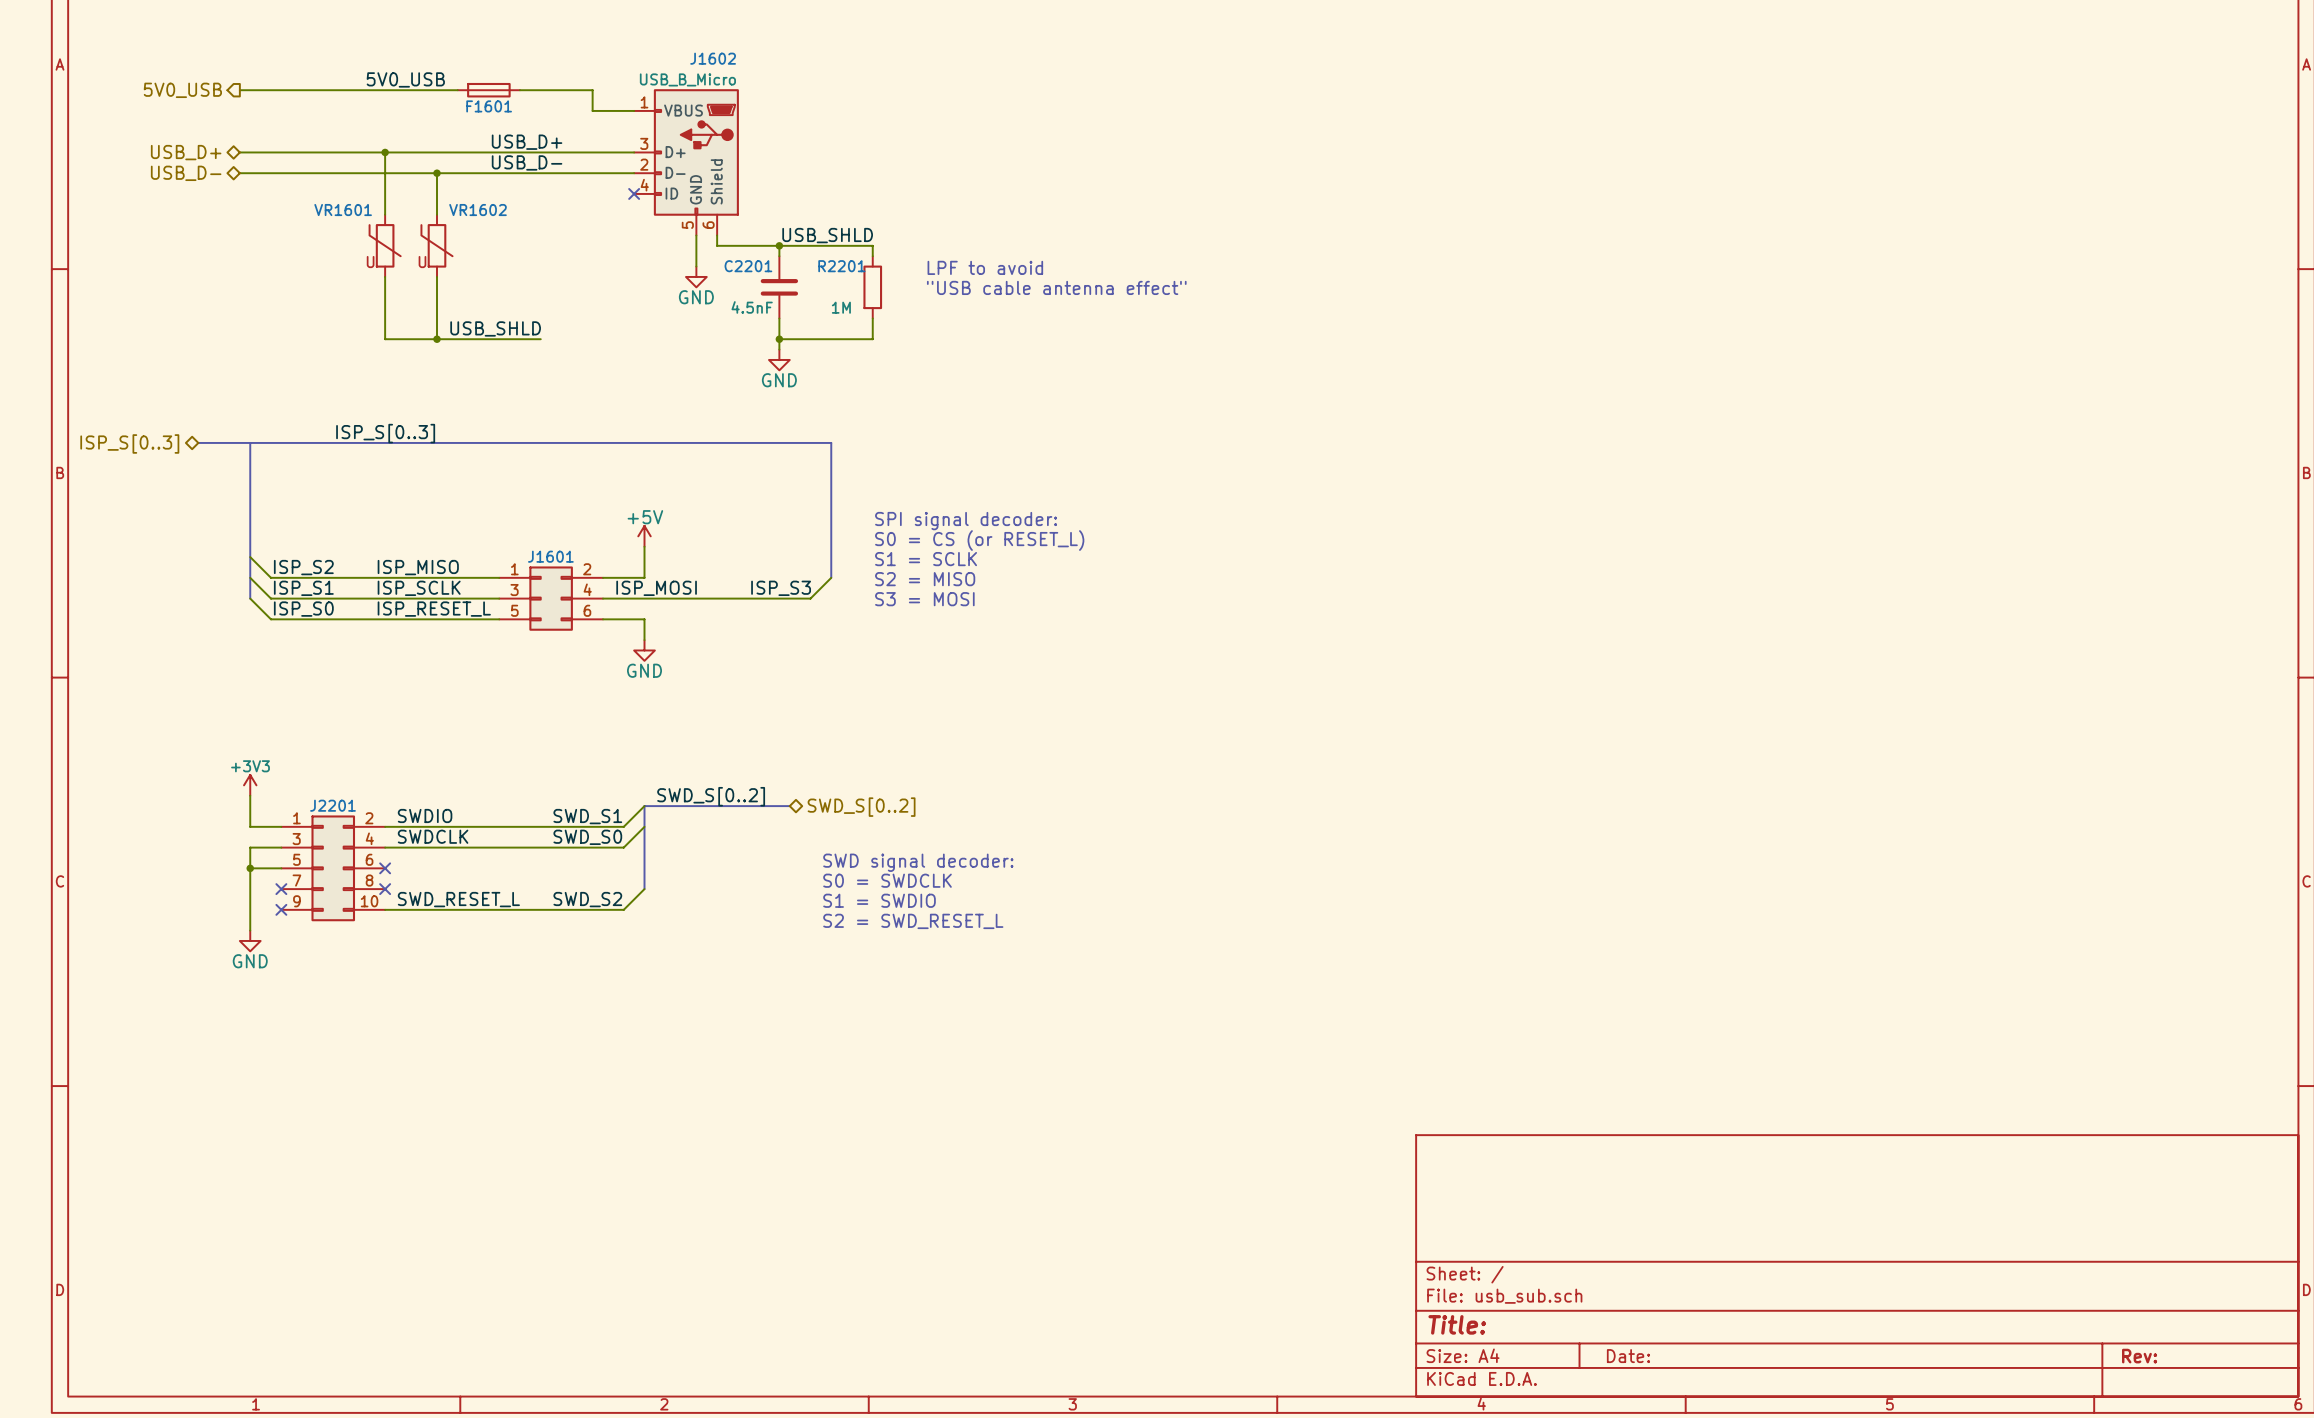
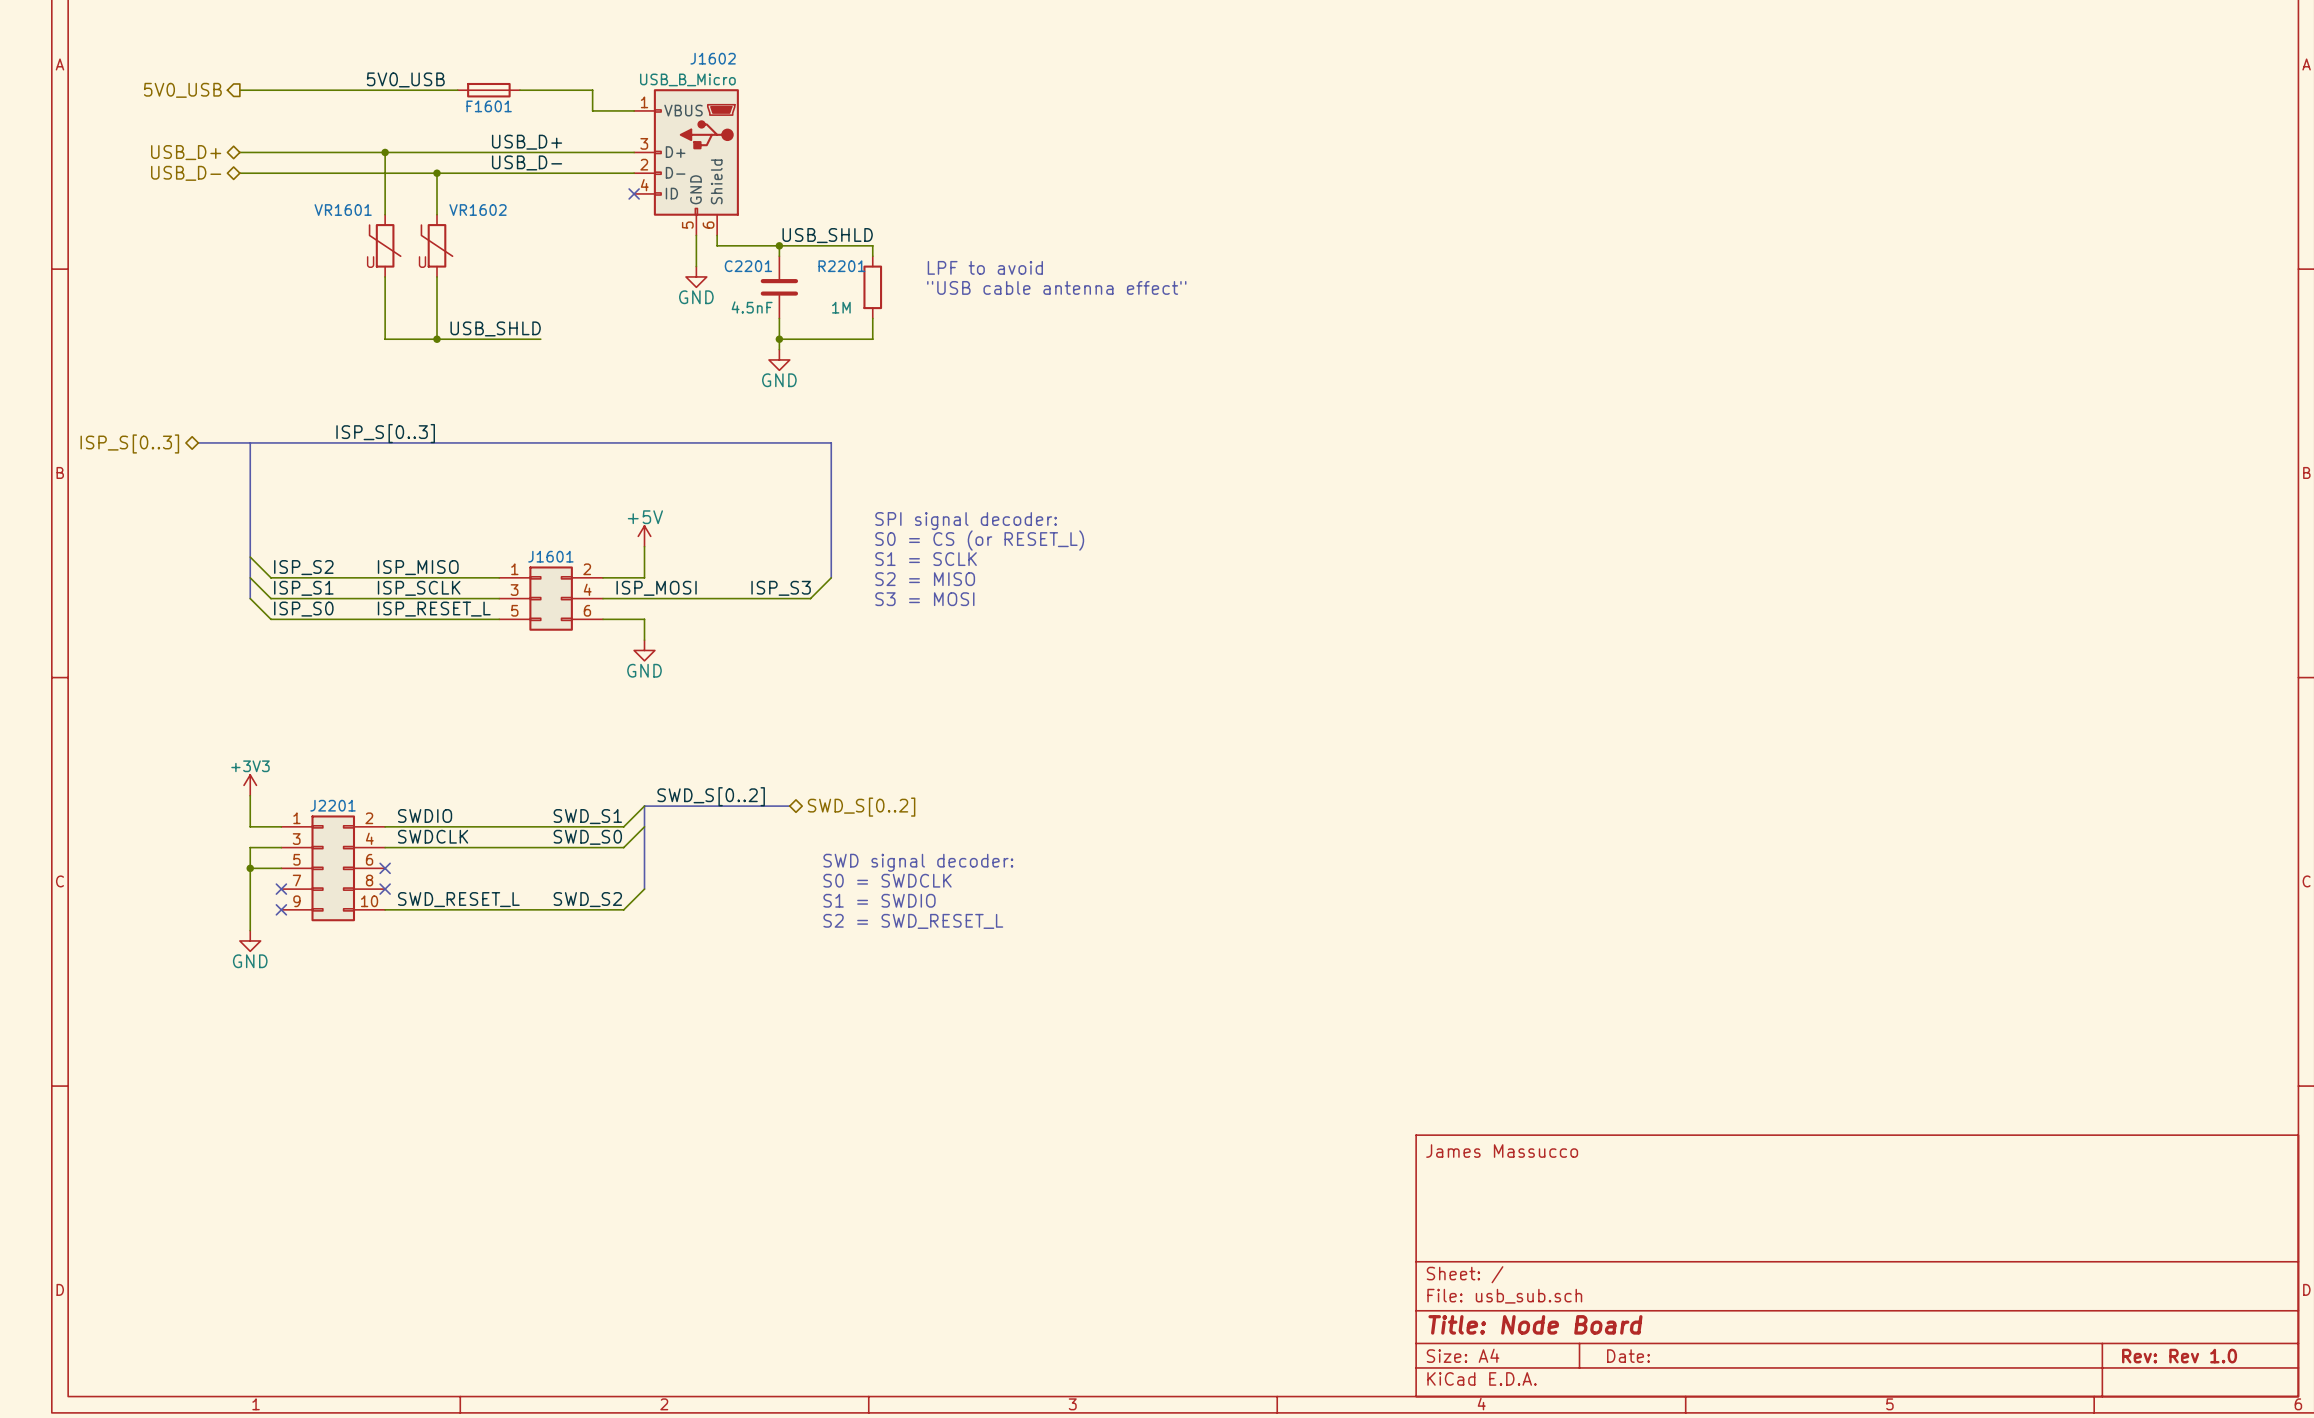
title block: none -> James Massucco (1502, 1151)
title block: Title: (1457, 1324) -> Title: Node Board (1535, 1324)
title block: Rev: (2139, 1356) -> Rev: Rev 1.0 (2179, 1356)

